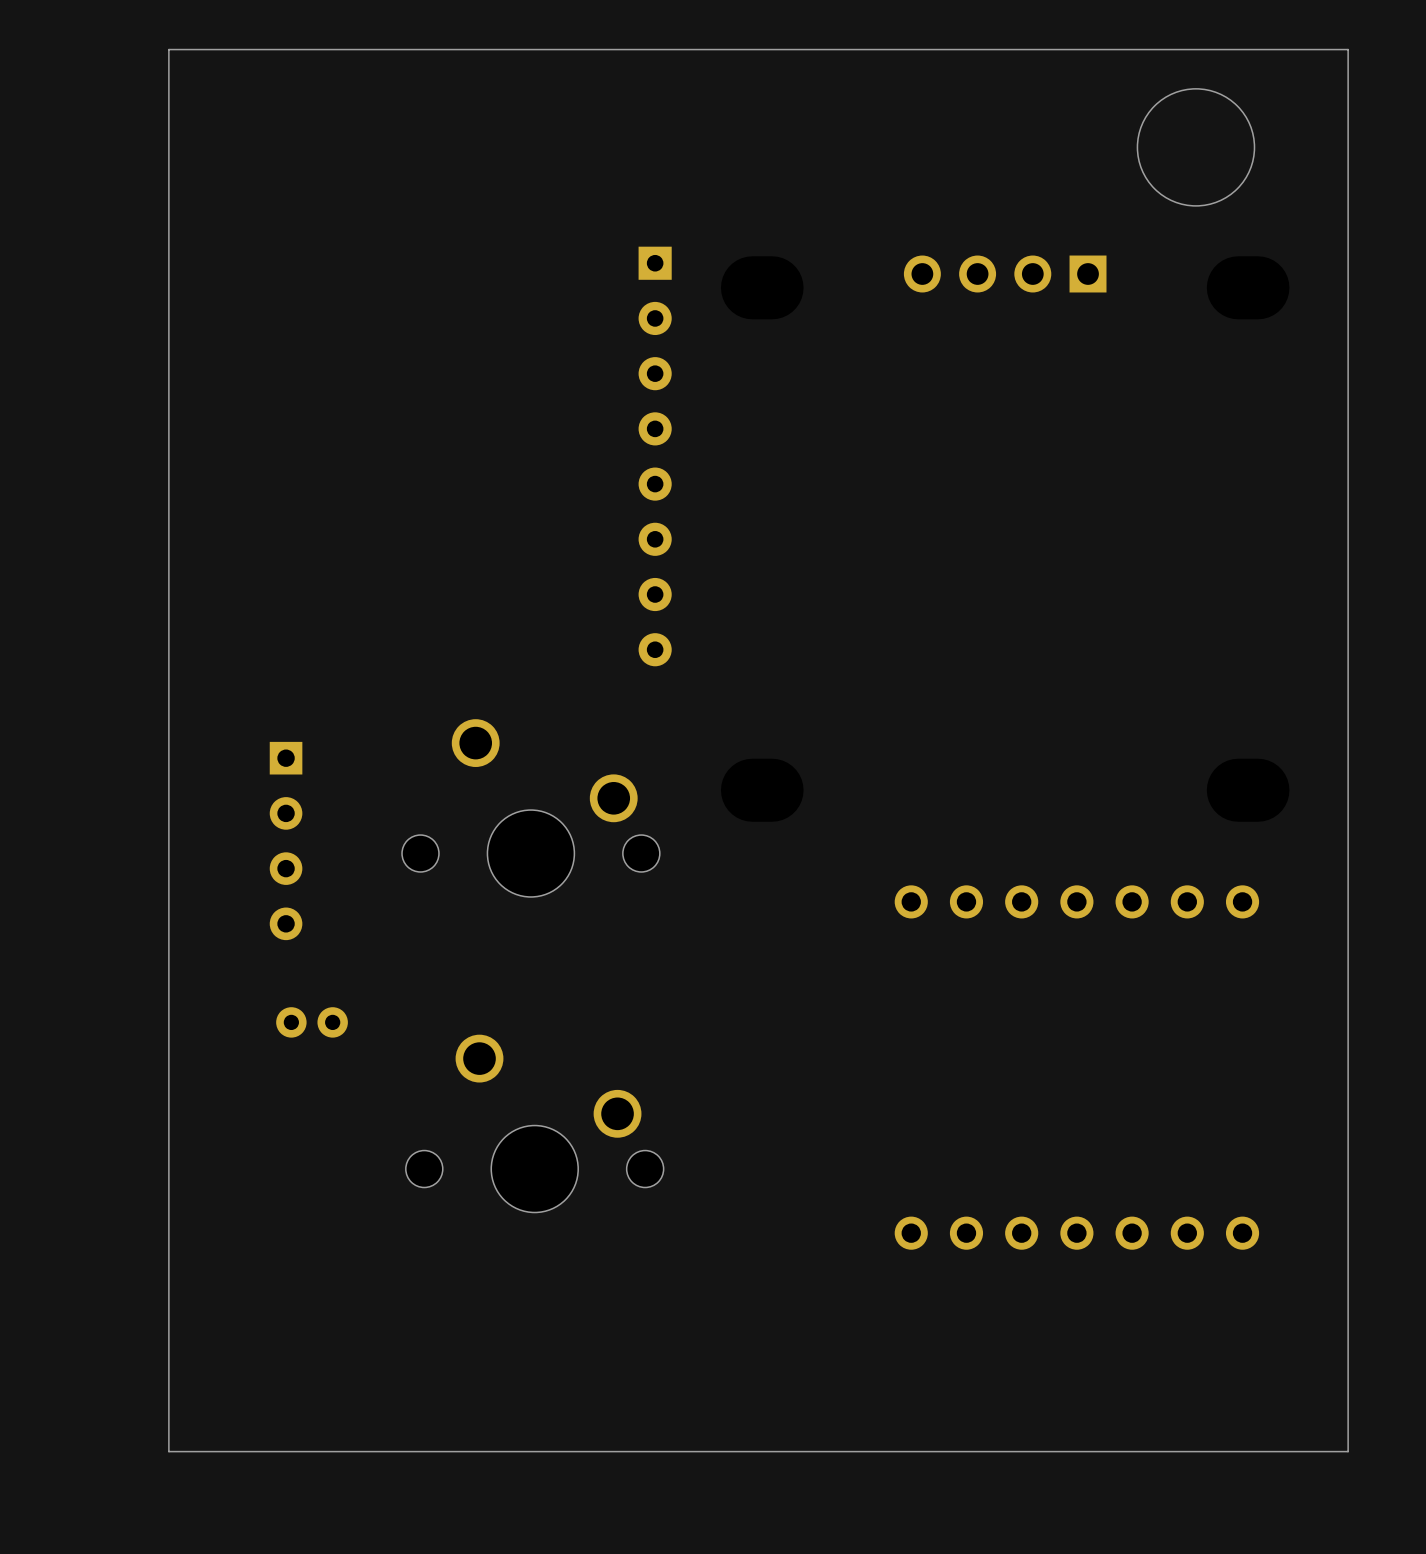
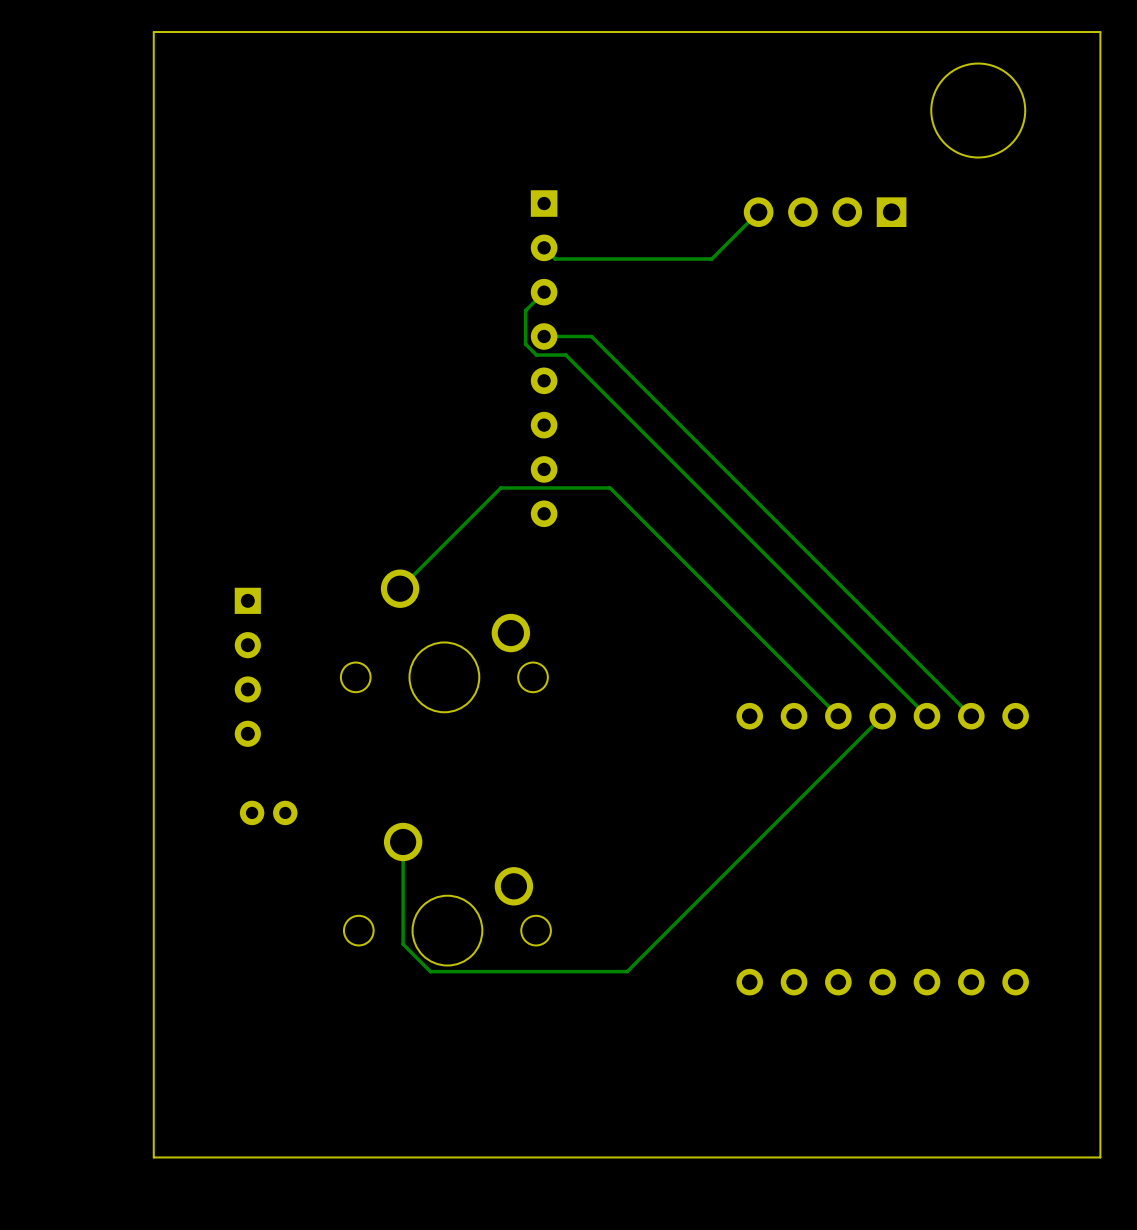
track: none -> (758, 212) (711, 259) (555, 259) (544, 247)
track: none -> (544, 292) (525, 310) (525, 344) (536, 355) (565, 355) (926, 716)
track: none -> (544, 336) (591, 336) (971, 716)
track: none -> (400, 588) (500, 487) (610, 487) (838, 716)
track: none -> (882, 716) (627, 971) (430, 971) (403, 944) (403, 841)

